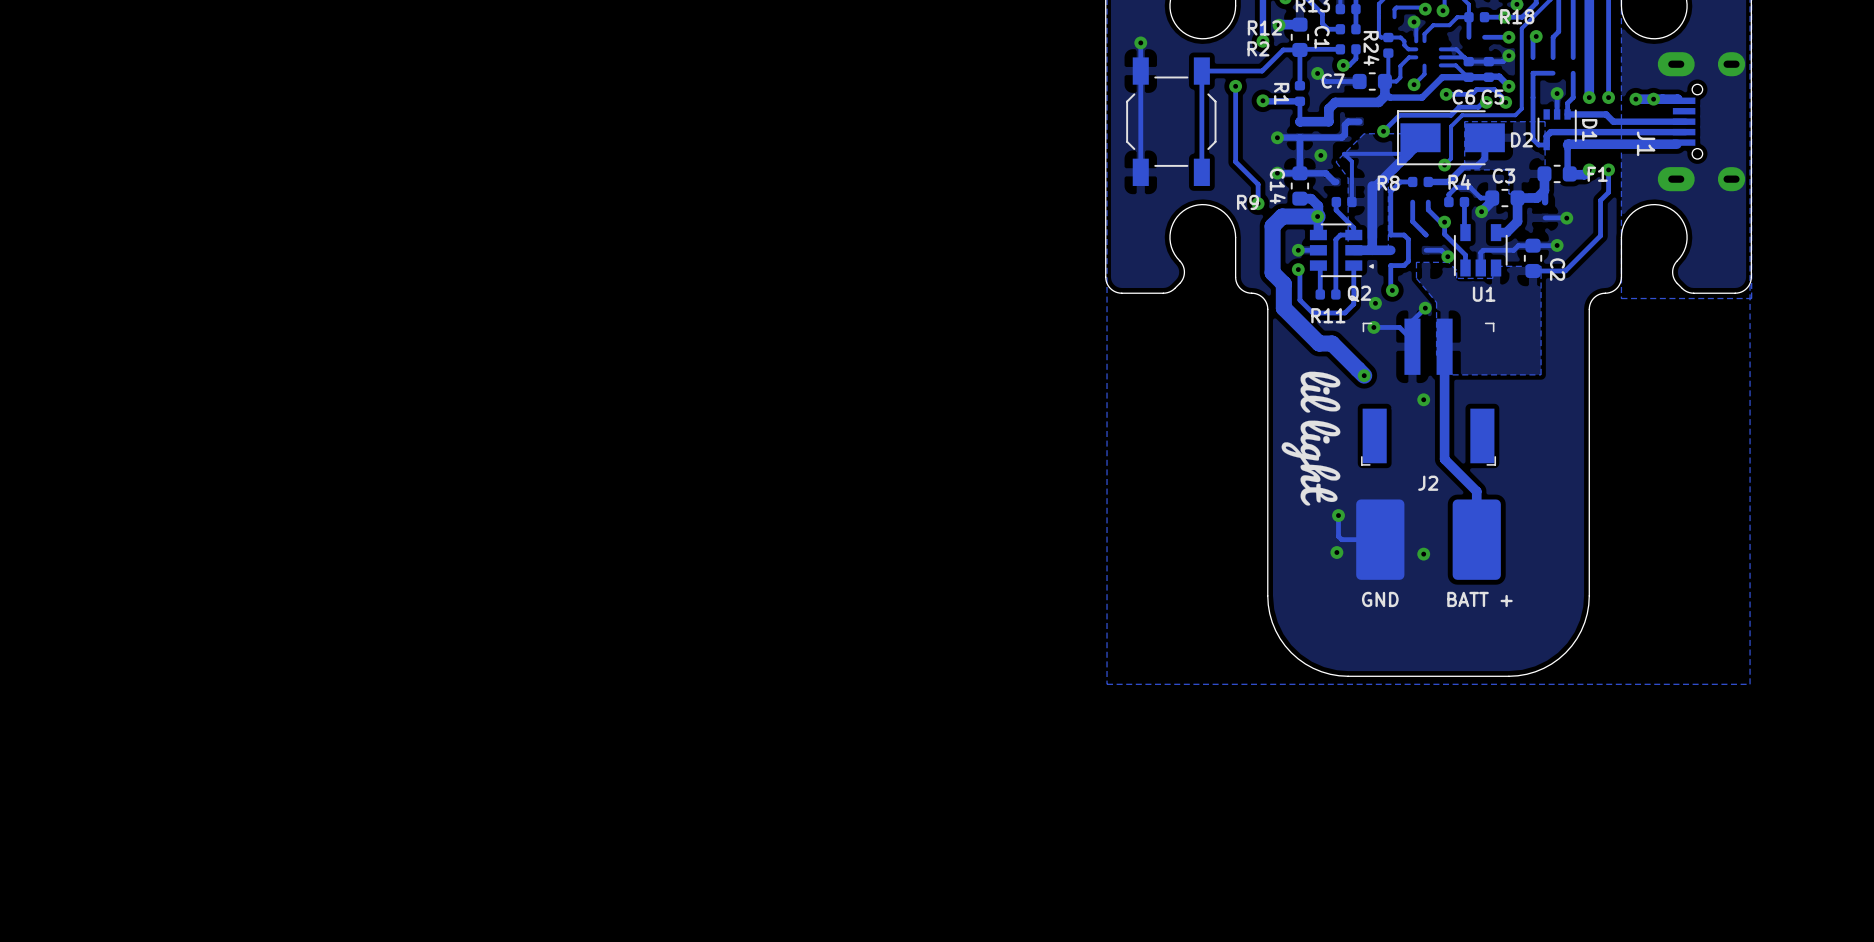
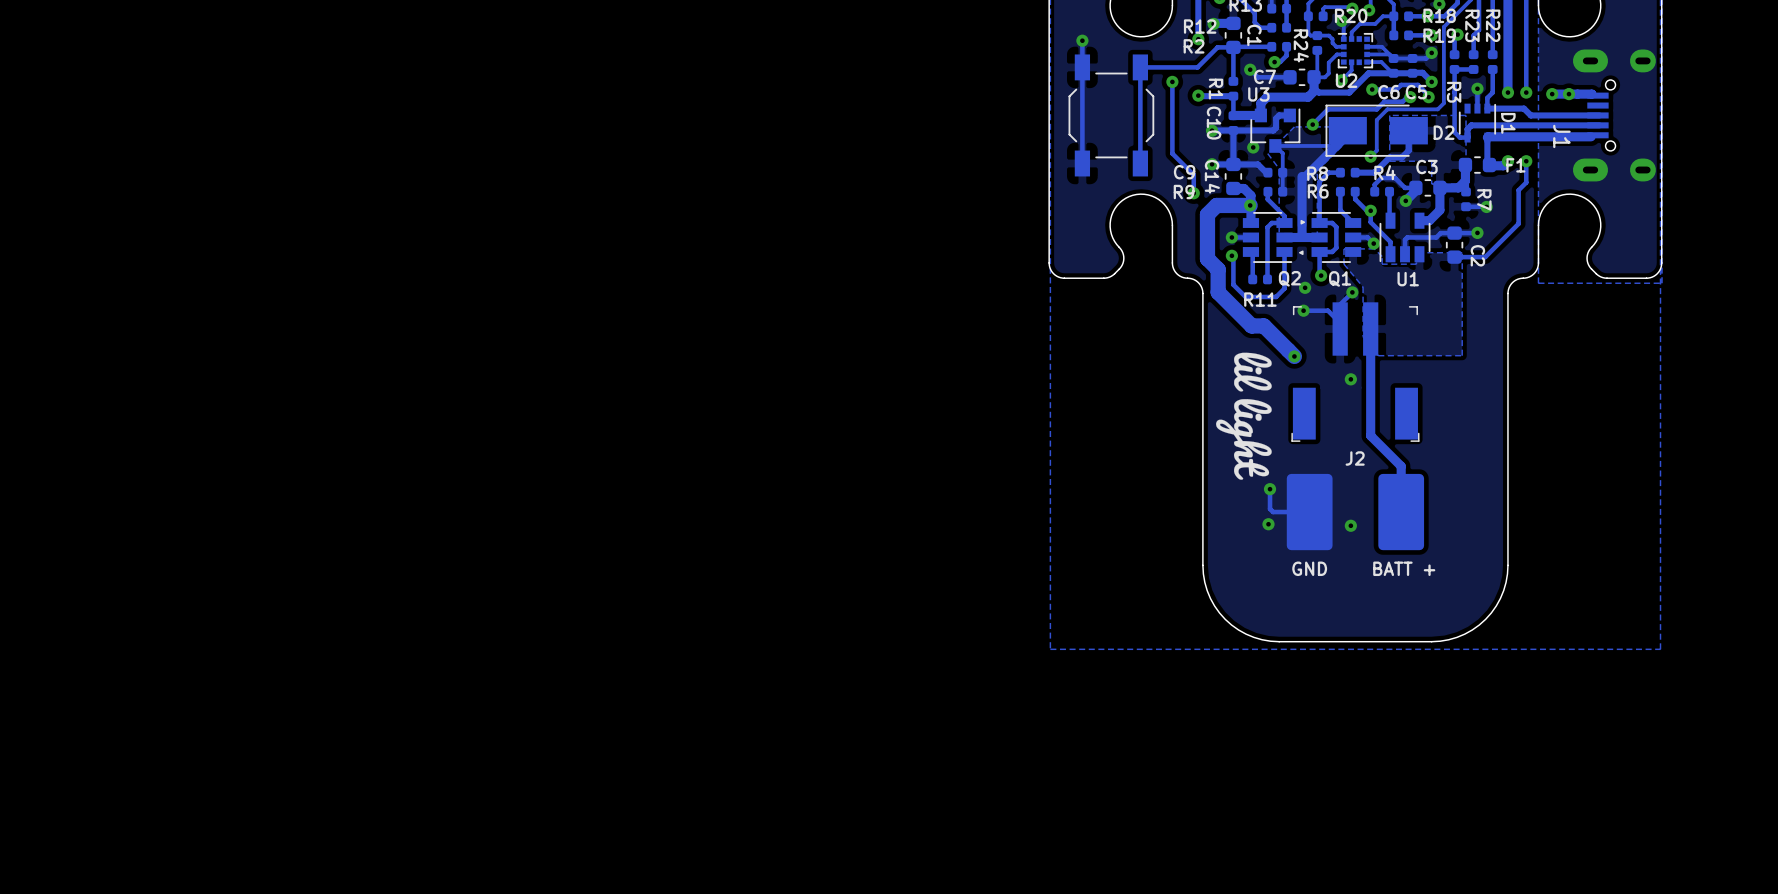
R20: none -> (1315, 16)
R19: none -> (1401, 35)
U2: none -> (1351, 50)
R3: none -> (1454, 62)
R23: none -> (1473, 62)
R22: none -> (1492, 62)
C10: none -> (1233, 123)
U3: none -> (1275, 130)
C9: none -> (1275, 172)
R6: none -> (1347, 191)
R7: none -> (1466, 199)
Q1: none -> (1330, 237)

